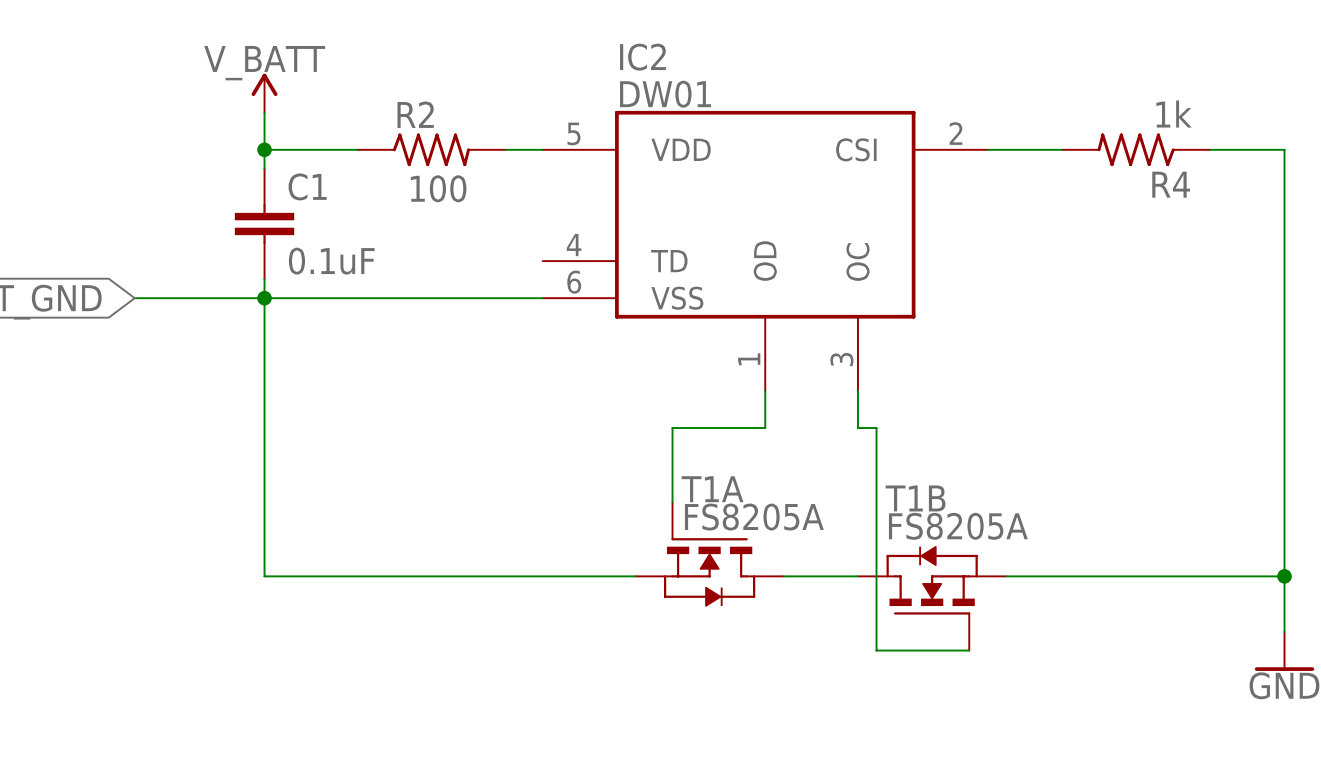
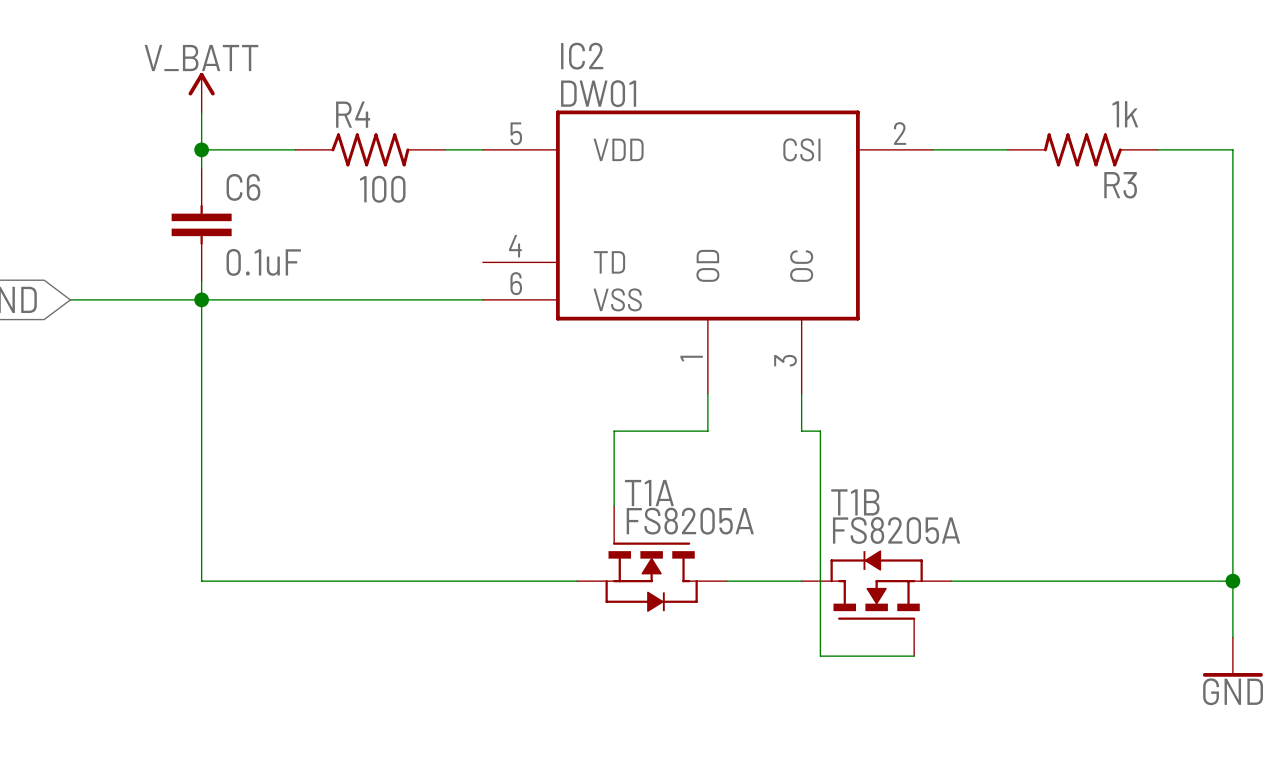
R2 name: R2 (415, 114) -> R4 (353, 114)
R4 name: R4 (1171, 184) -> R3 (1120, 185)
C1 name: C1 (307, 186) -> C6 (243, 187)

